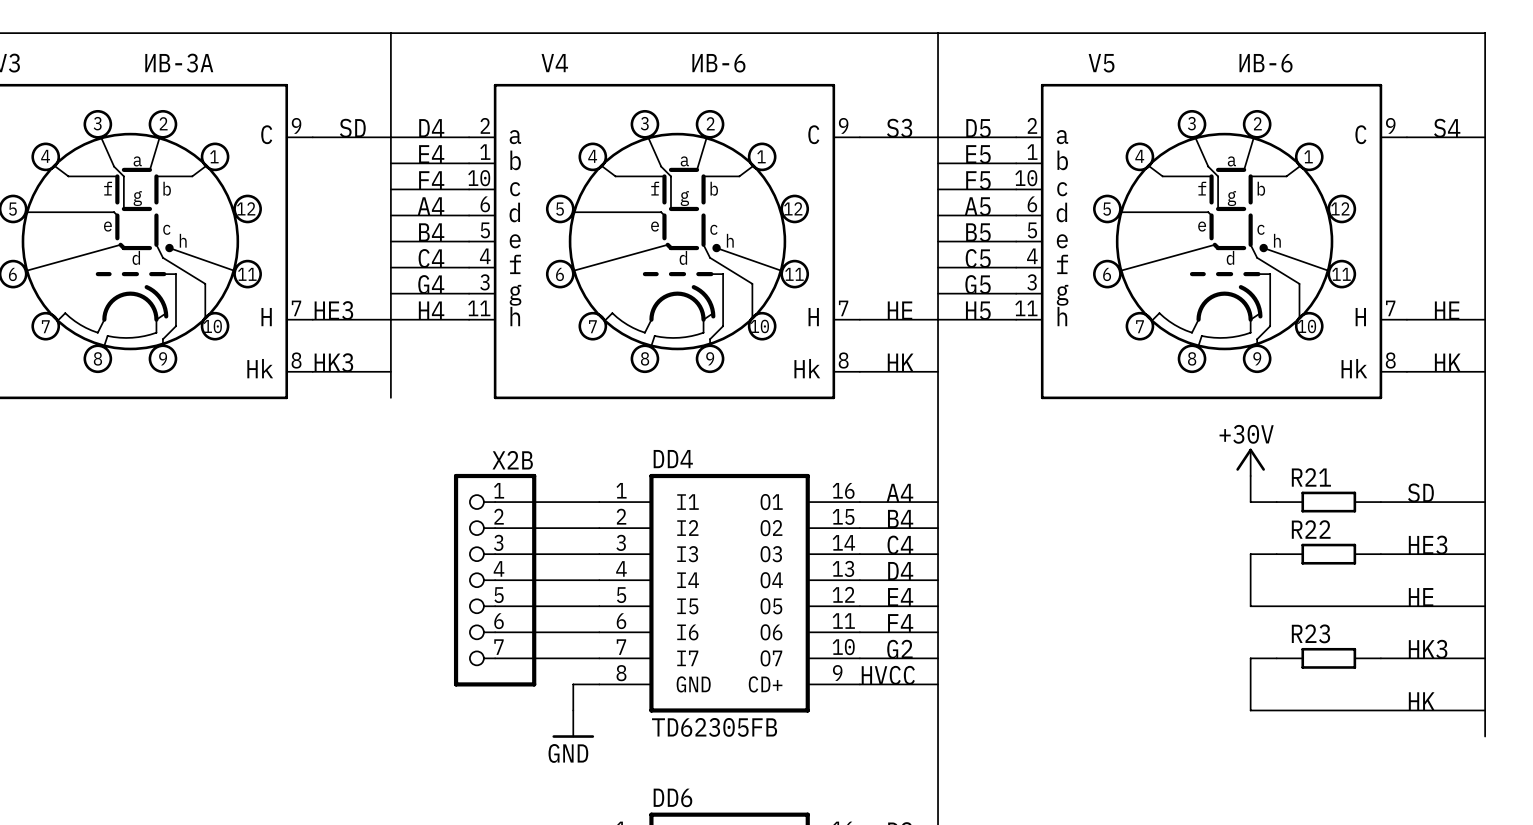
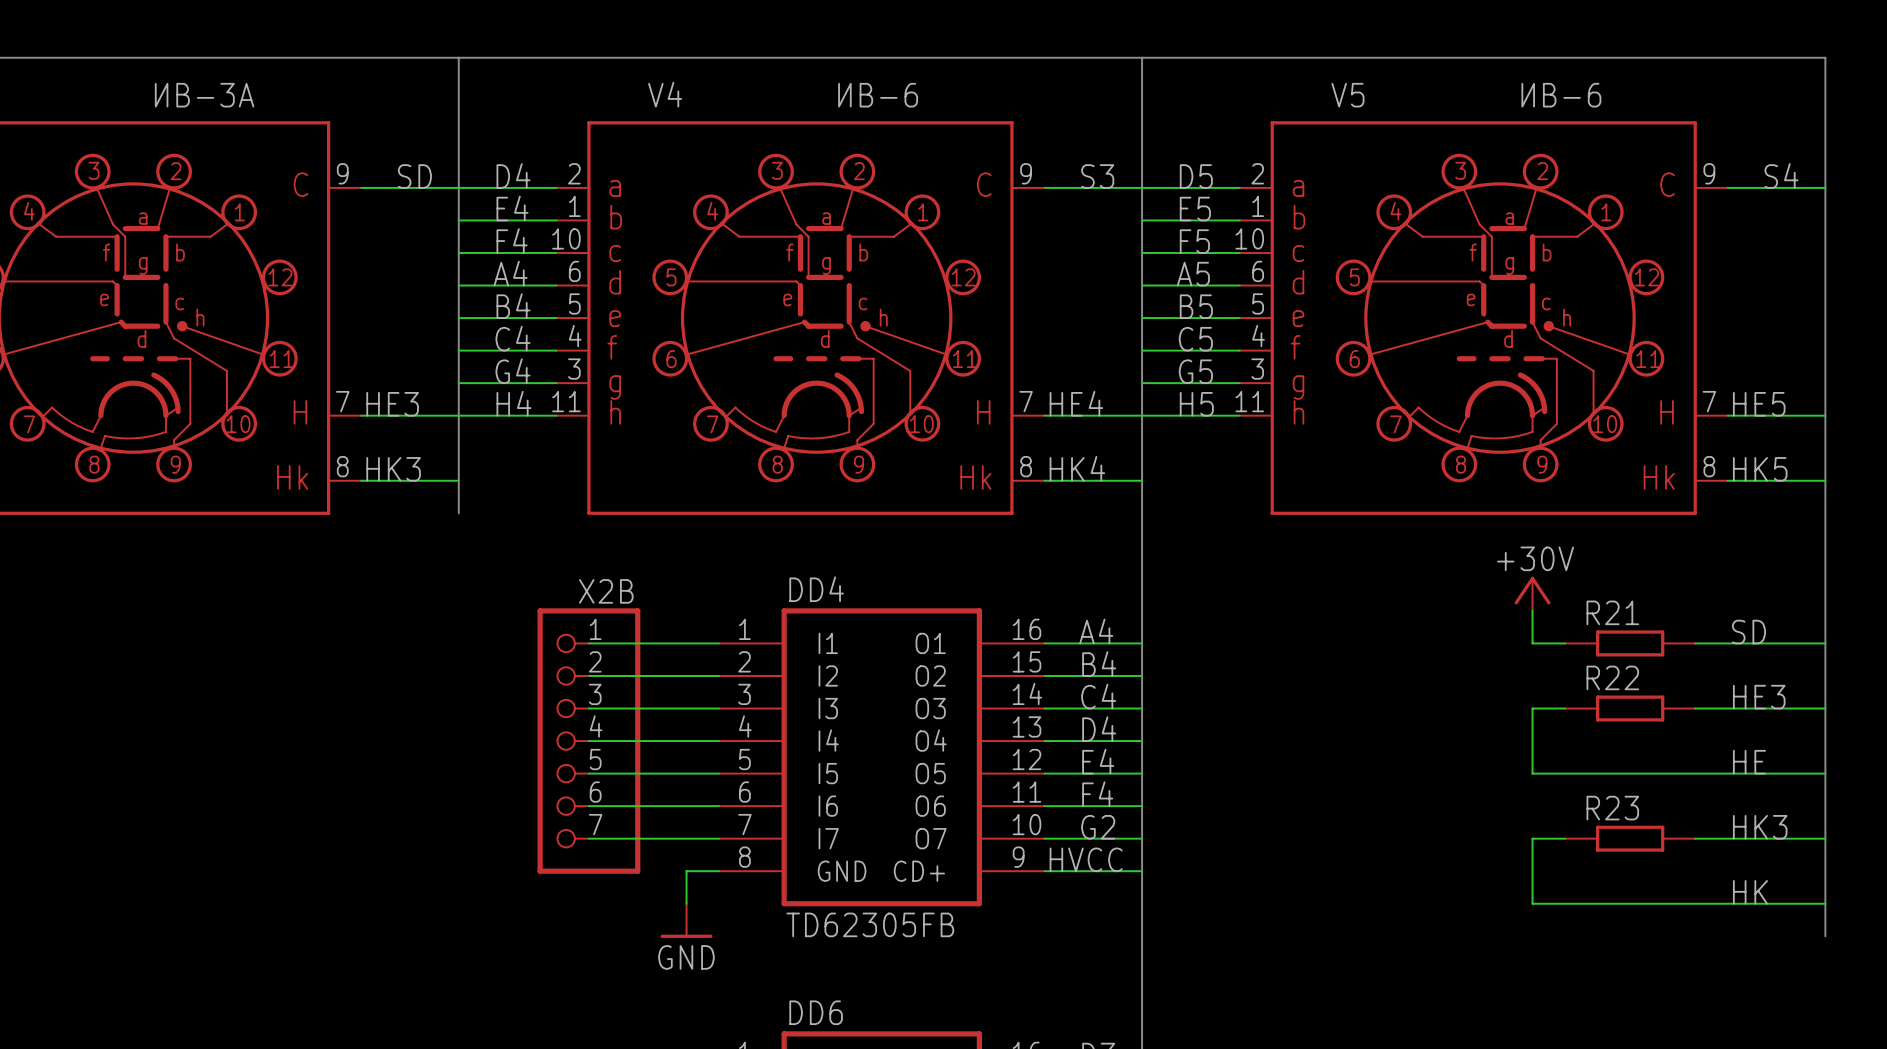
label: HE (900, 310) -> HE4 (1076, 403)
label: HE (1447, 310) -> HE5 (1759, 404)
label: HK (900, 362) -> HK4 (1077, 468)
label: HK (1447, 362) -> HK5 (1760, 469)

